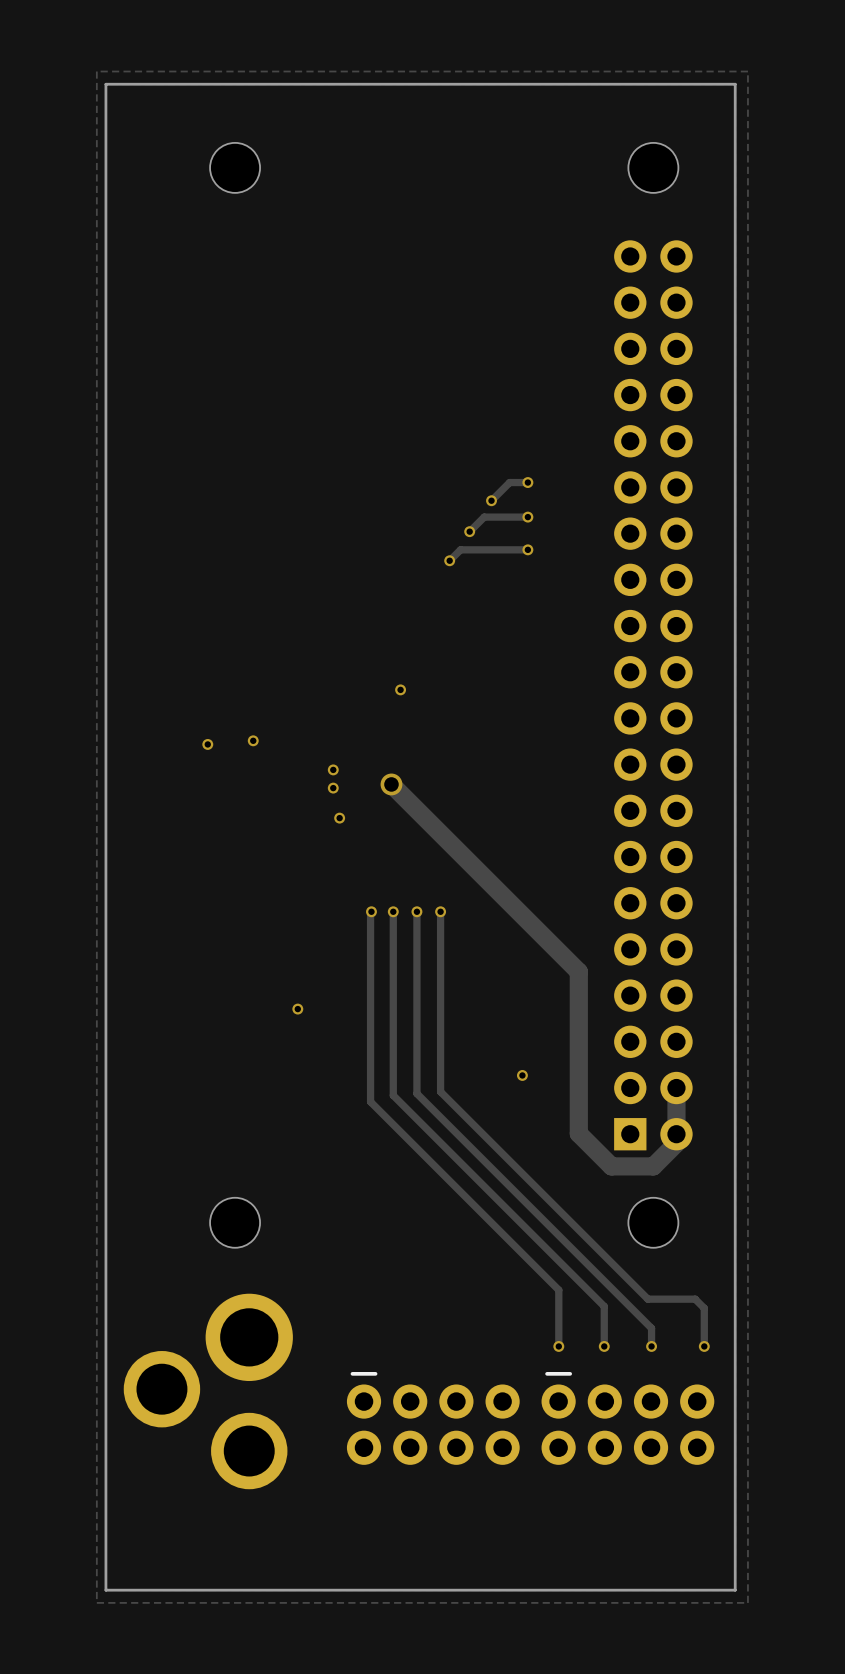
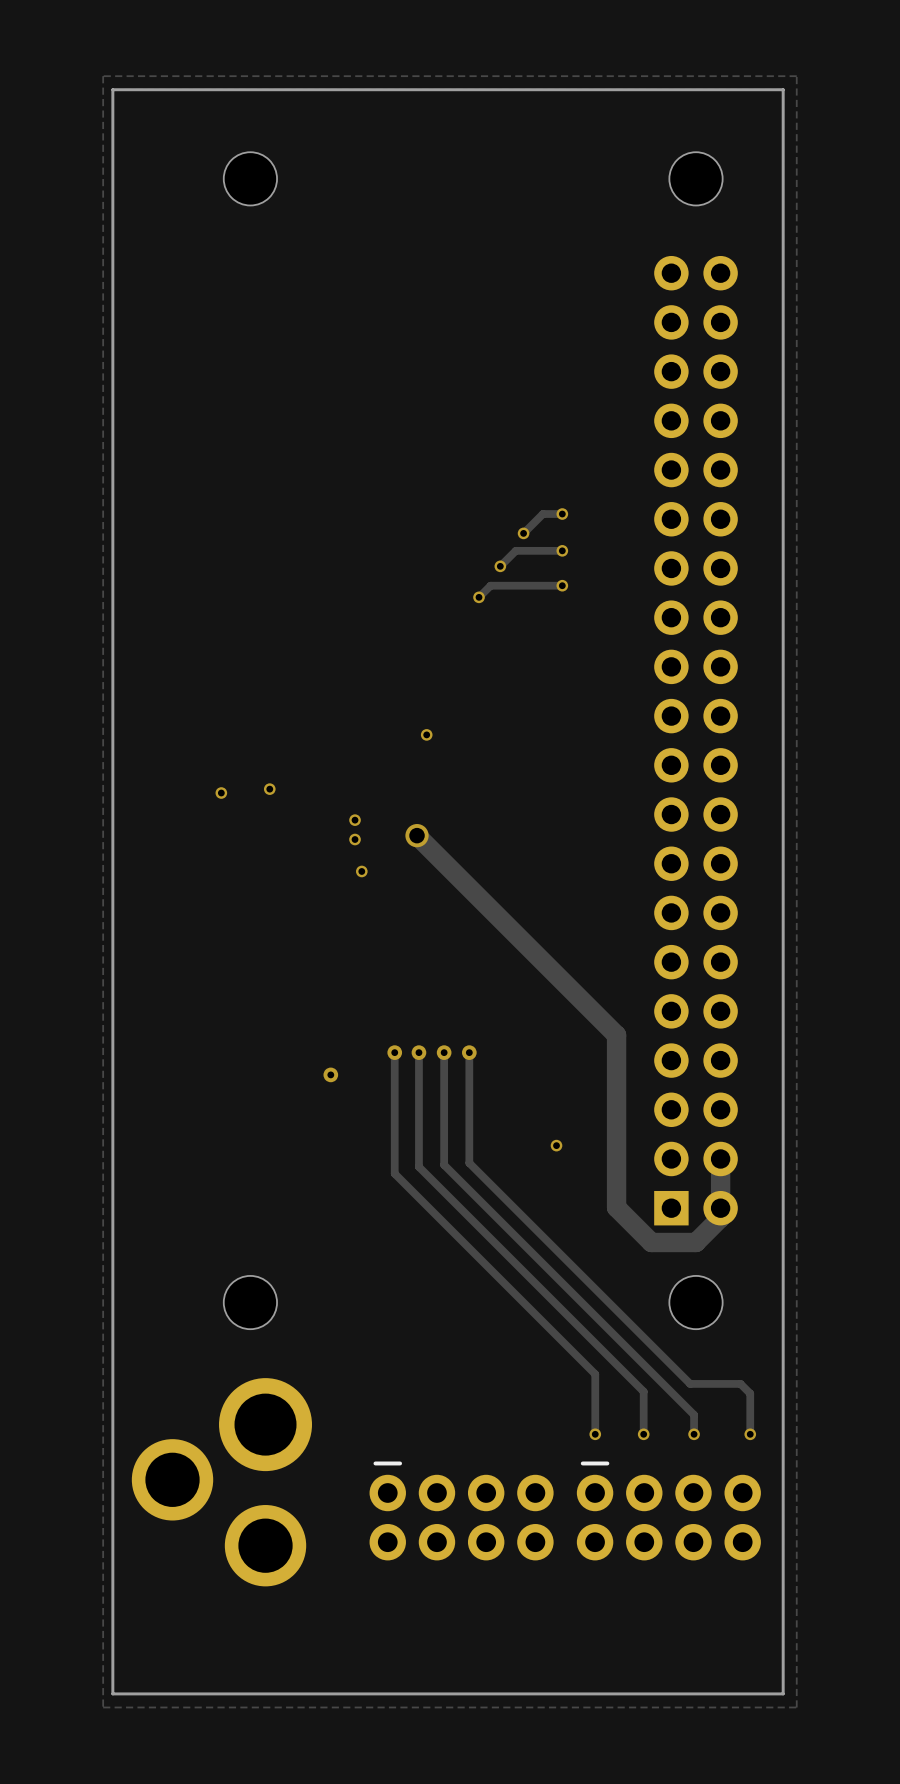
track: (371, 911) (370, 988) -> none
via: (371, 911) -> none
track: (393, 911) (393, 988) -> none
via: (393, 911) -> none
track: (416, 911) (416, 988) -> none
via: (416, 911) -> none
track: (440, 911) (440, 988) -> none
via: (440, 911) -> none
via: none -> (394, 1052)
via: none -> (418, 1052)
via: none -> (444, 1052)
via: none -> (469, 1052)
via: (297, 1009) -> none
via: none -> (330, 1074)

